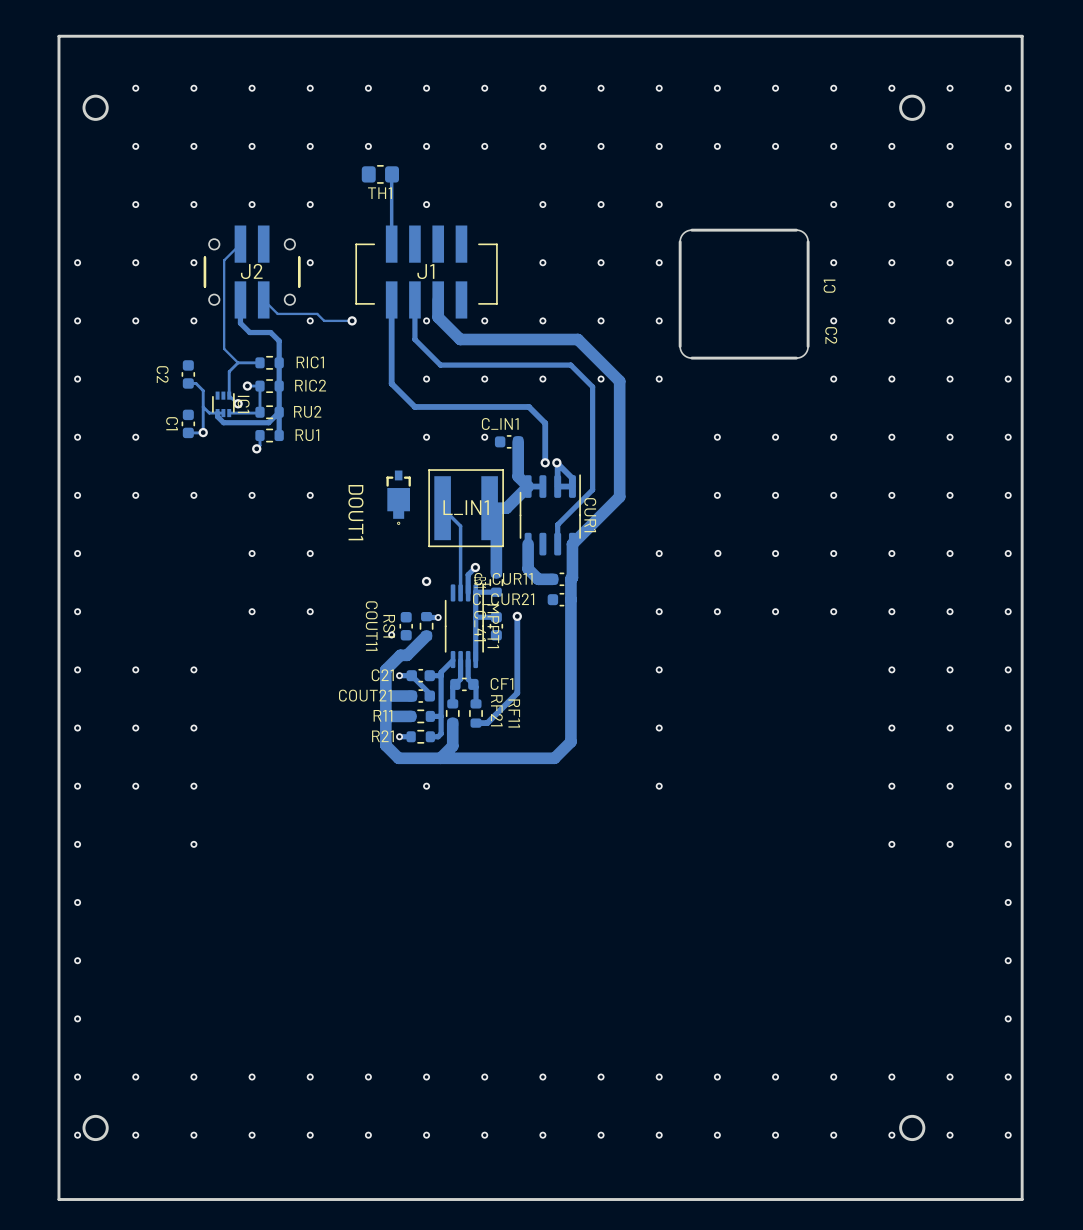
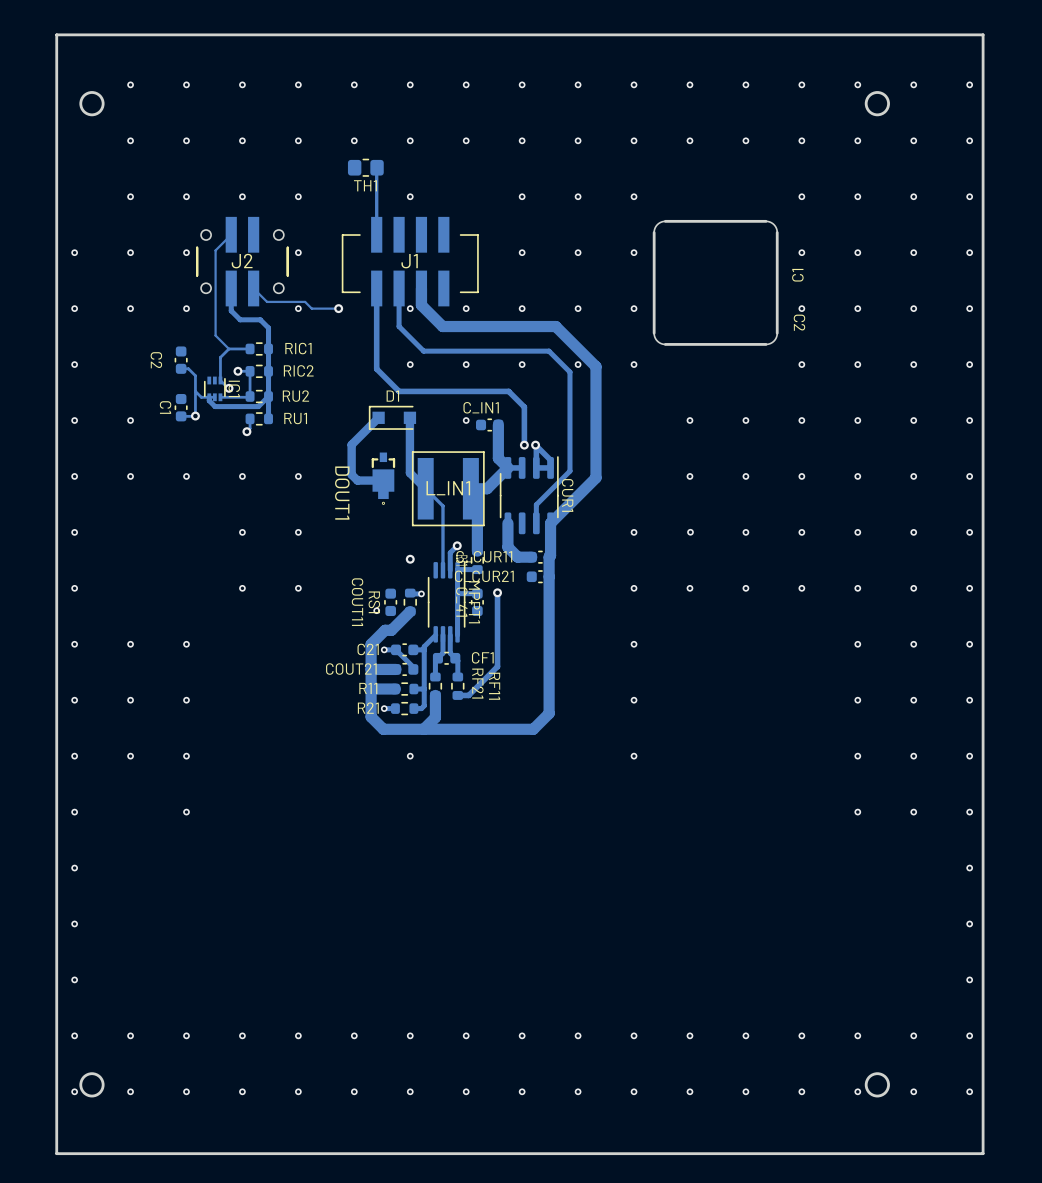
track: none -> (378, 417) (351, 444) (351, 474) (357, 480) (383, 480)
D1: none -> (392, 417)
track: none -> (409, 417) (409, 472) (425, 488)
via: (426, 437) -> none

